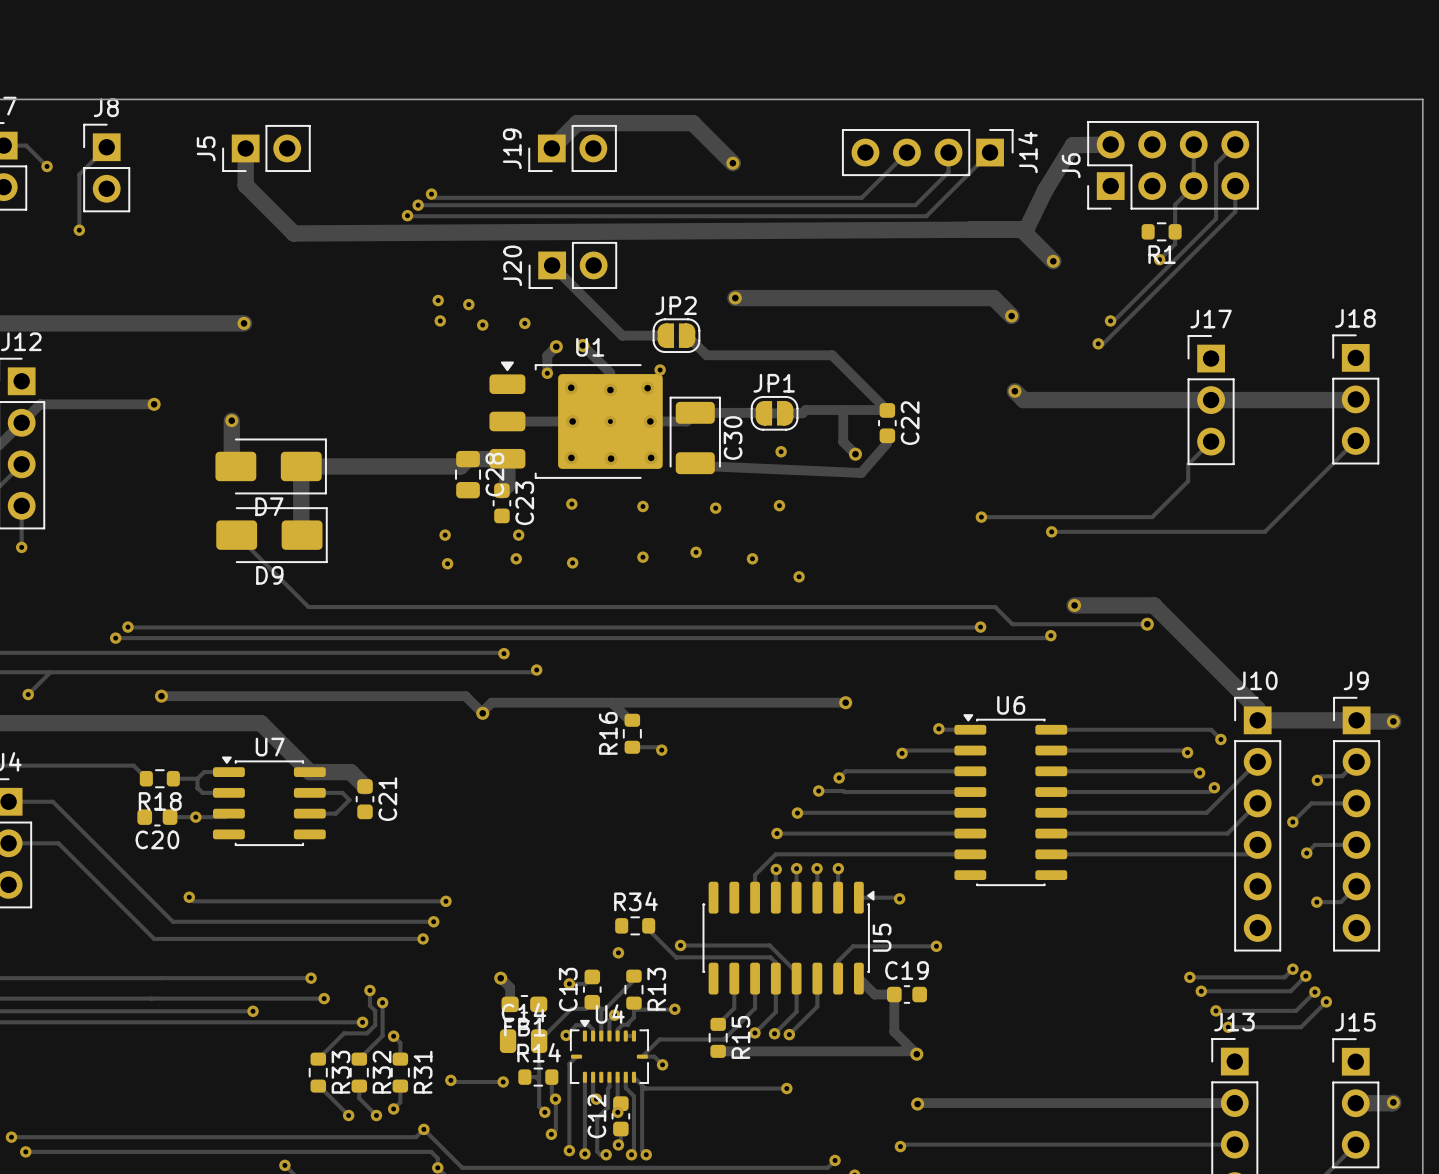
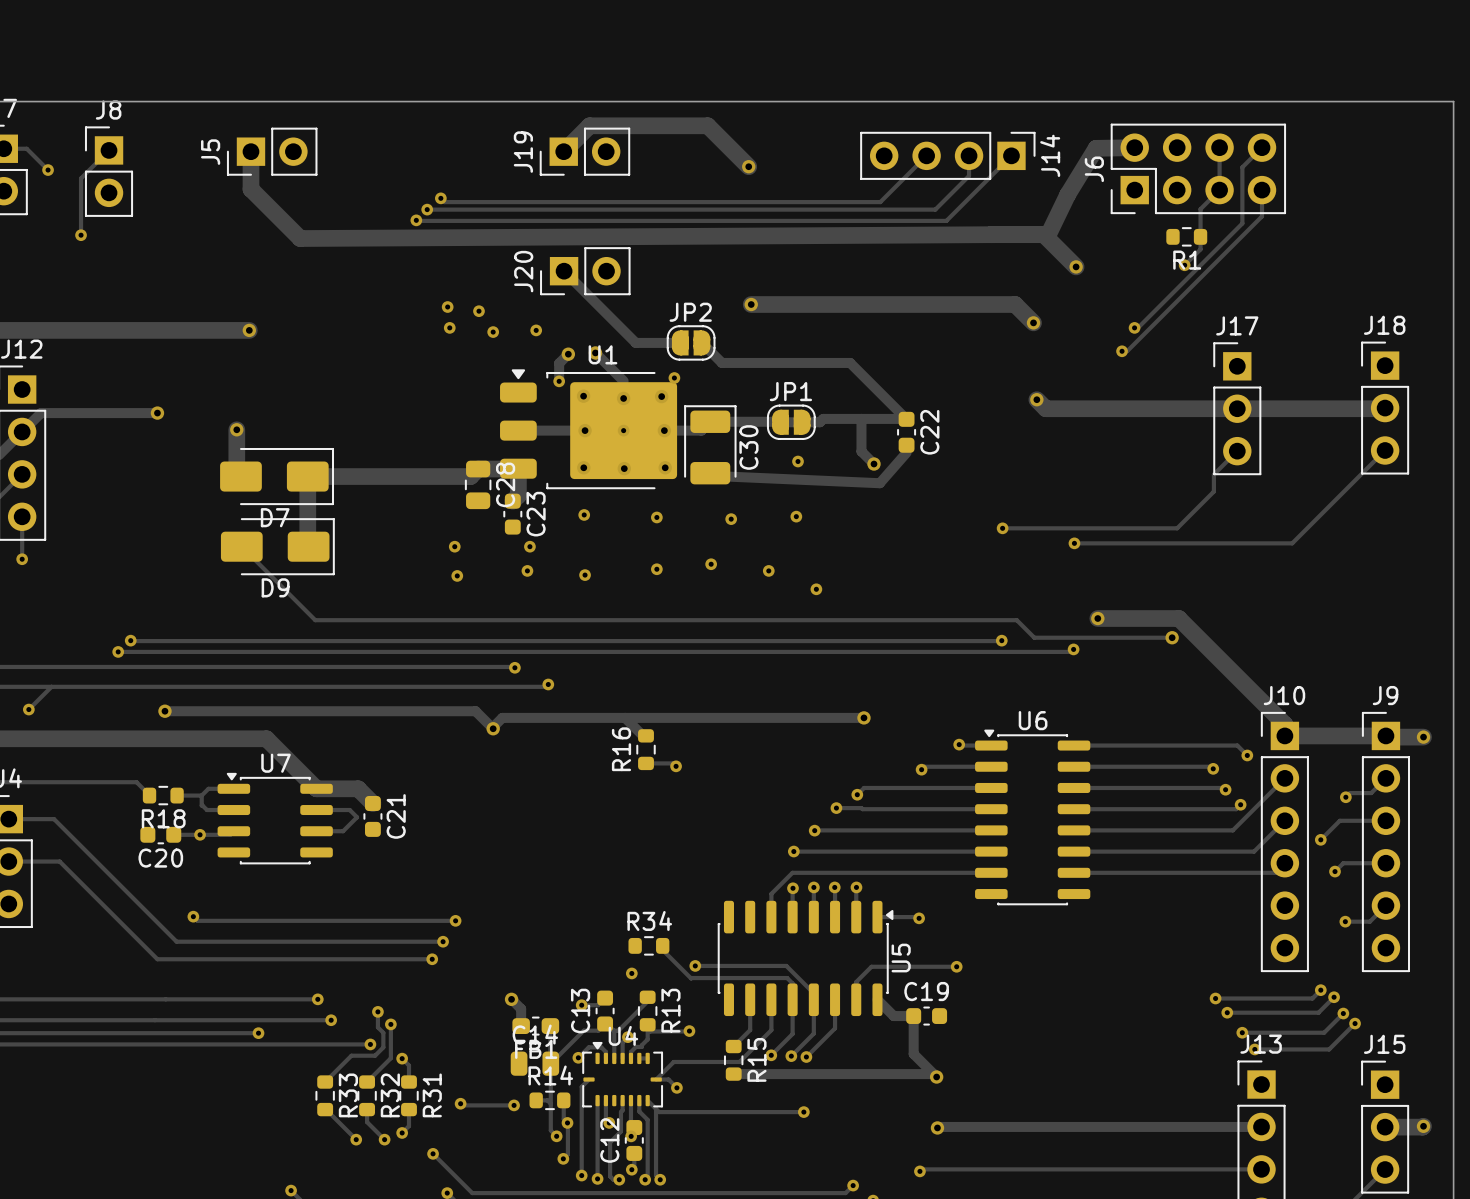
track: (423, 1129) (416, 1137) (11, 1137) -> none
via: (11, 1137) -> none
track: (25, 1151) (431, 1151) (437, 1158) (437, 1167) -> none
via: (25, 1151) -> none

